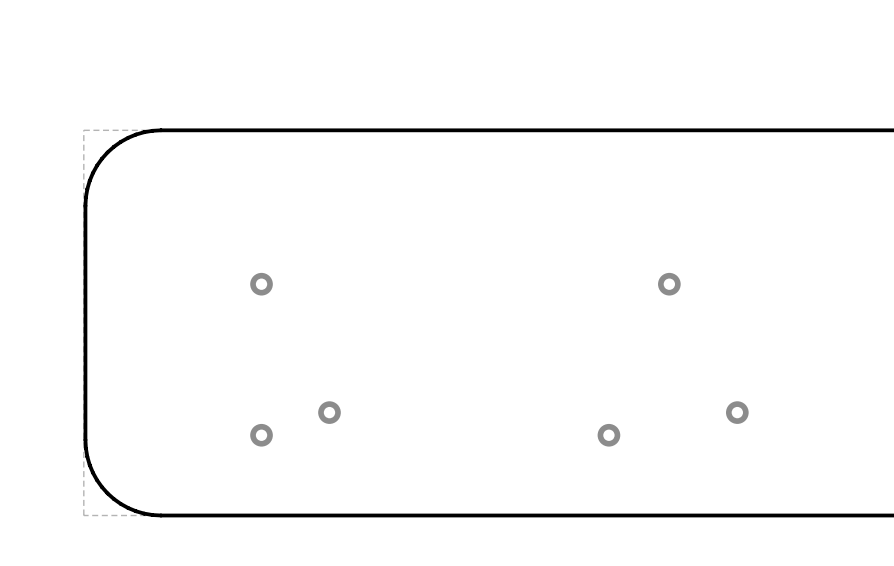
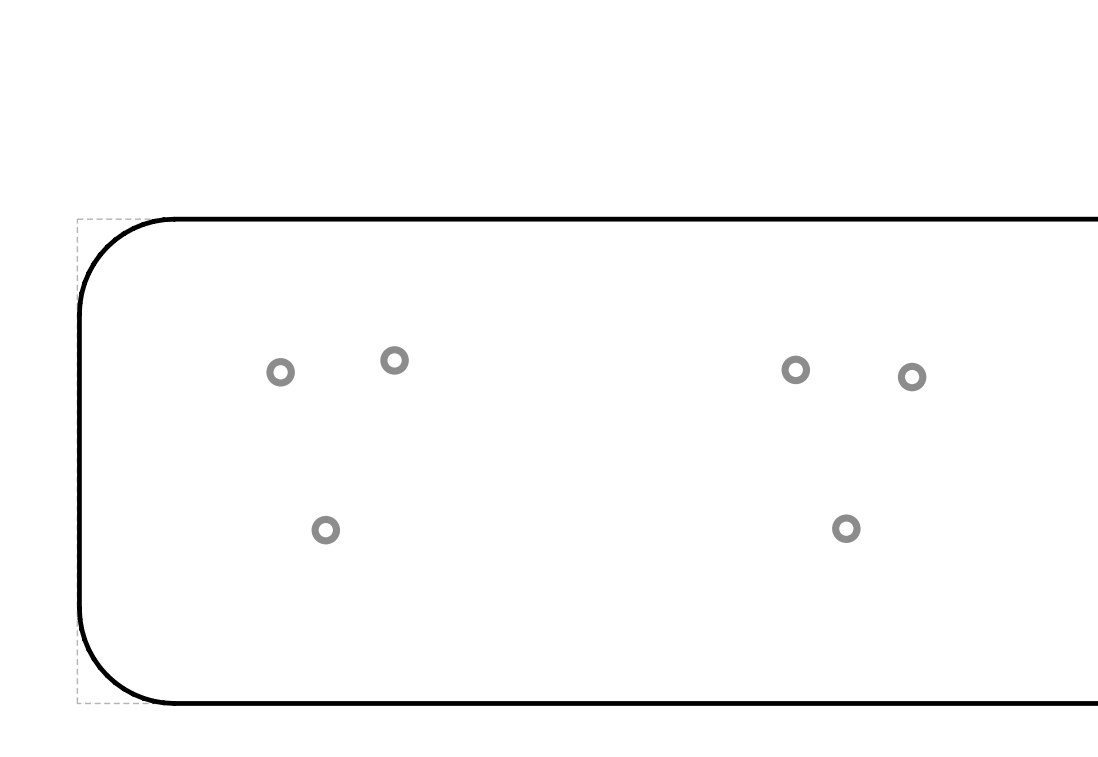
via: none -> (394, 360)
via: none -> (912, 377)
via position: (261, 284) -> (280, 372)
via position: (669, 284) -> (795, 369)
via: none -> (846, 528)
via: none -> (325, 530)
via: (329, 412) -> none
via: (737, 412) -> none
via: (261, 435) -> none
via: (608, 435) -> none

